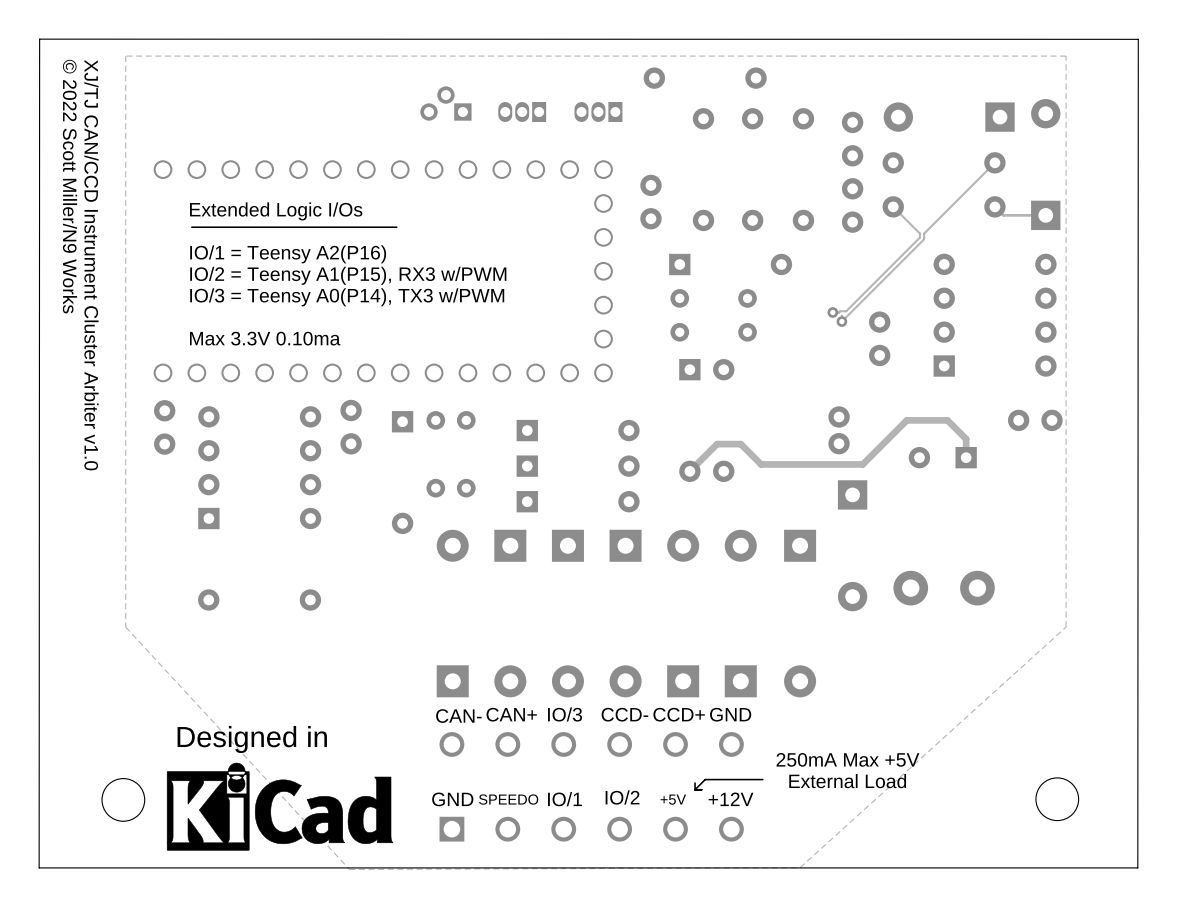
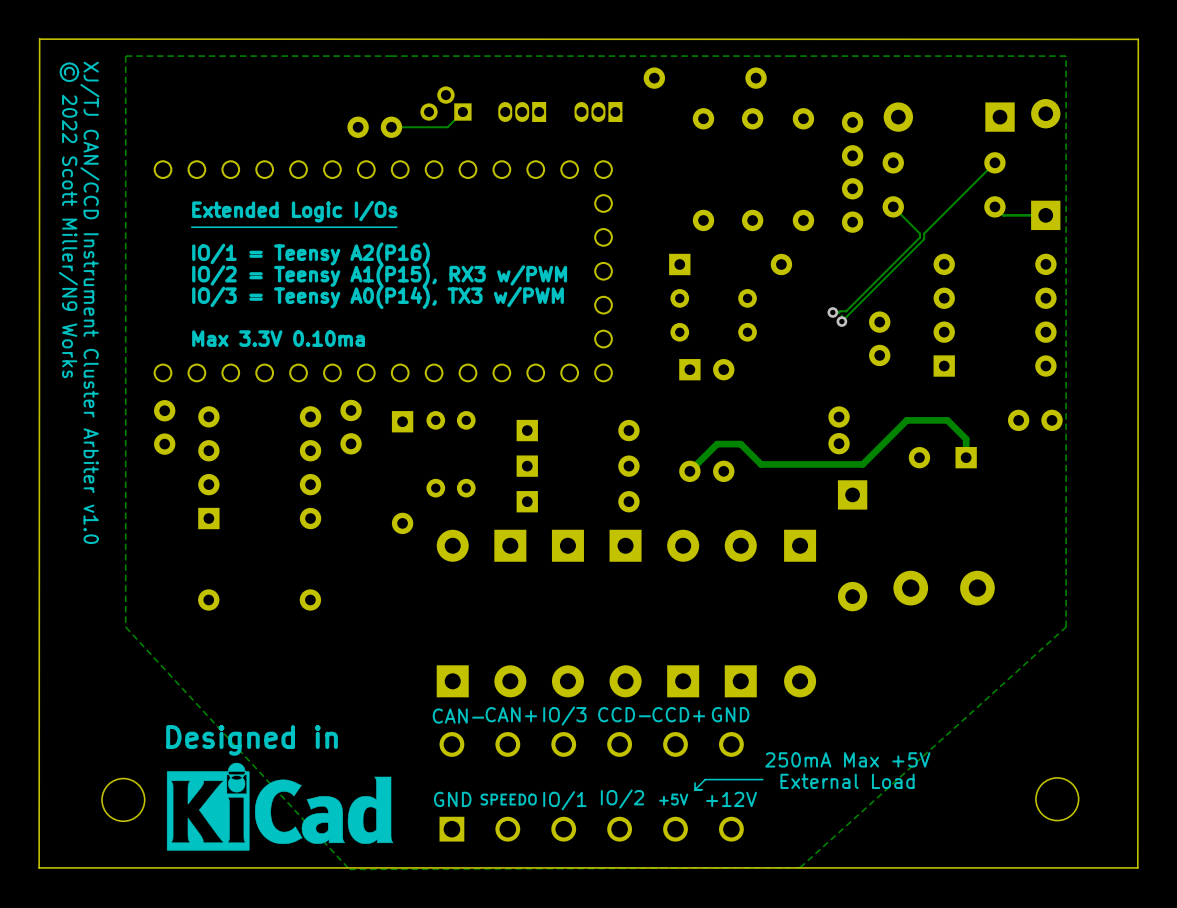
track: none -> (462, 112) (447, 127) (391, 127)
part rotation: 0° (650, 202) -> 90° clockwise (374, 127)
part position: (650, 202) -> (374, 127)

